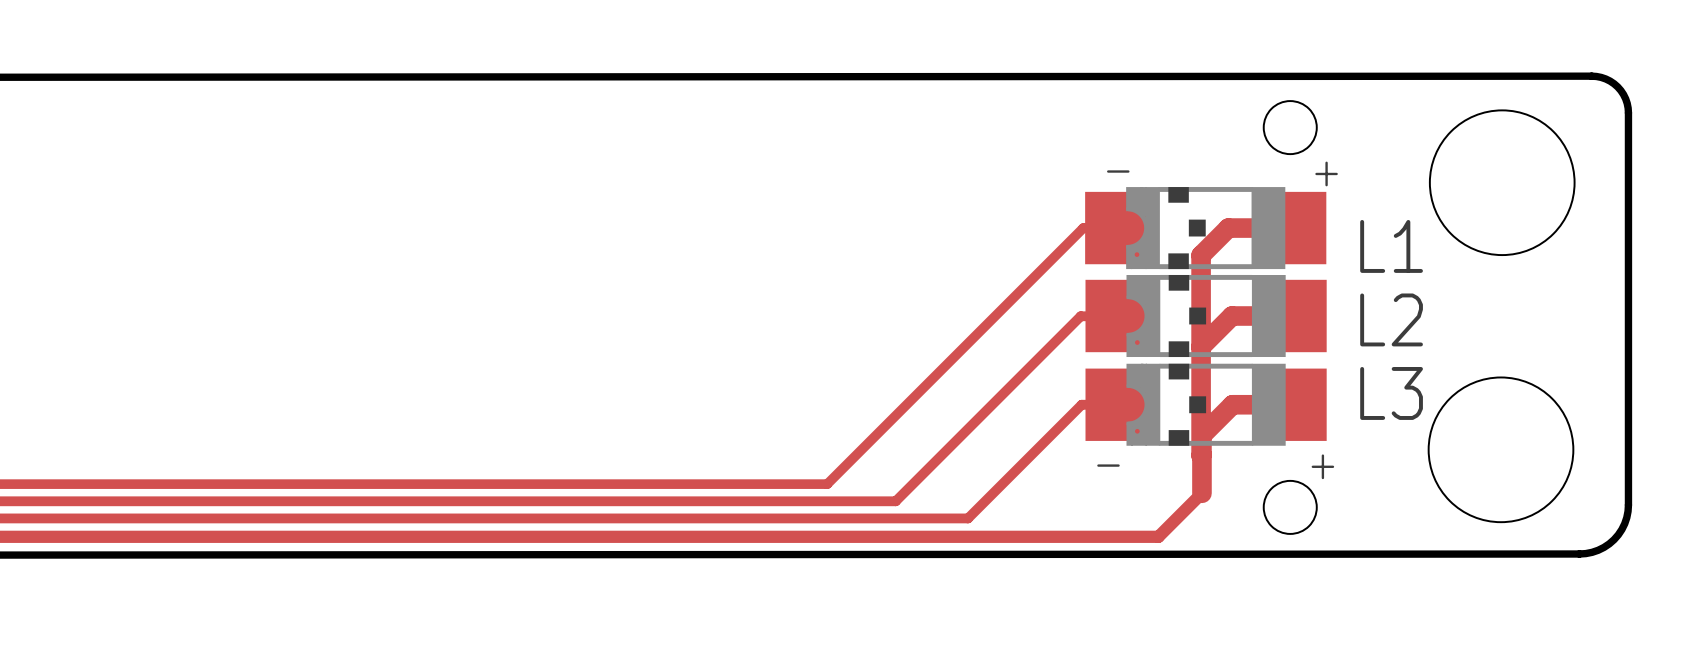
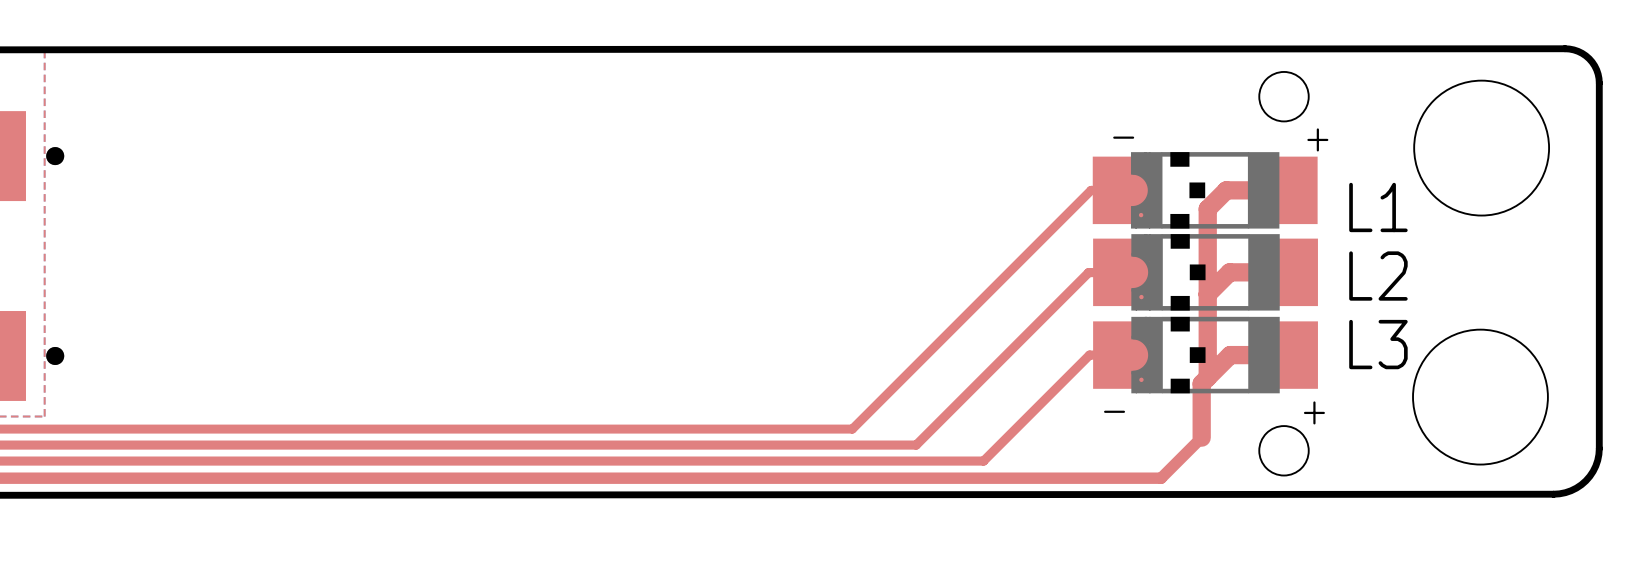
top track: (1208, 248) (1201, 255) (1201, 454) -> (1207, 208) (1207, 377)

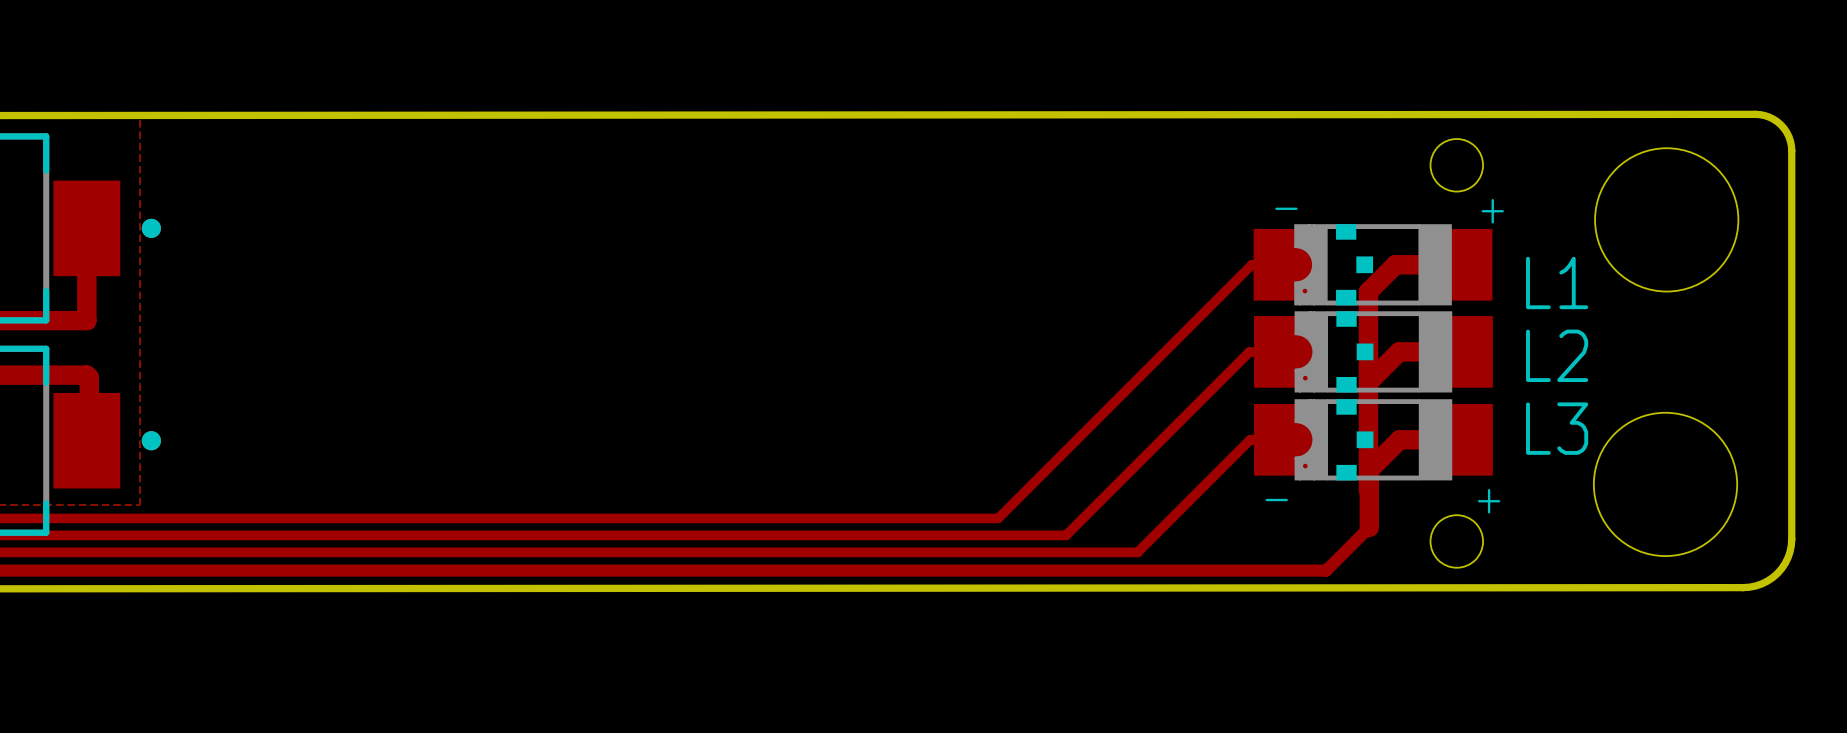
top track: (1207, 208) (1207, 377) -> (1375, 284) (1368, 291) (1369, 489)

